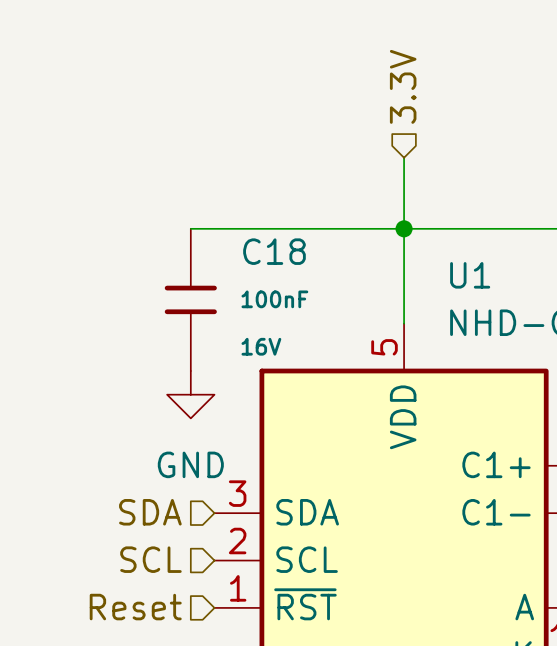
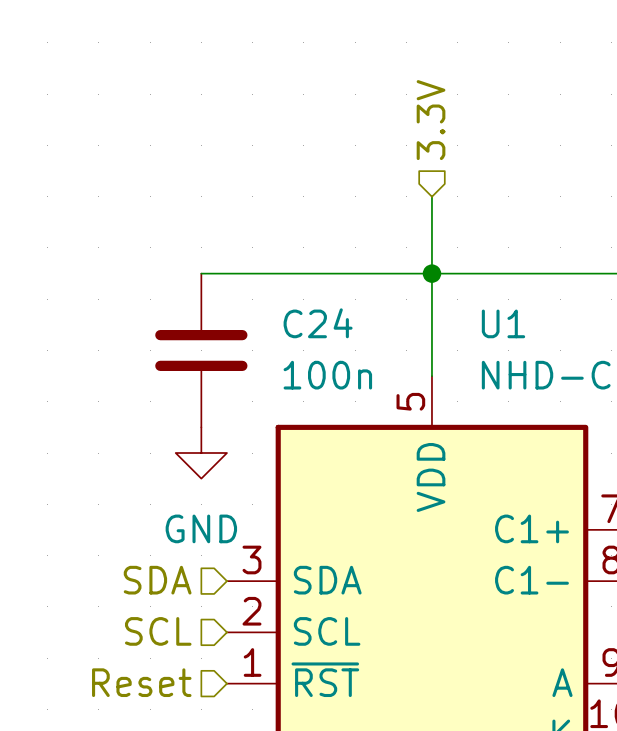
C18: 100nF (190, 299) -> none
C24: none -> 100n (201, 350)

